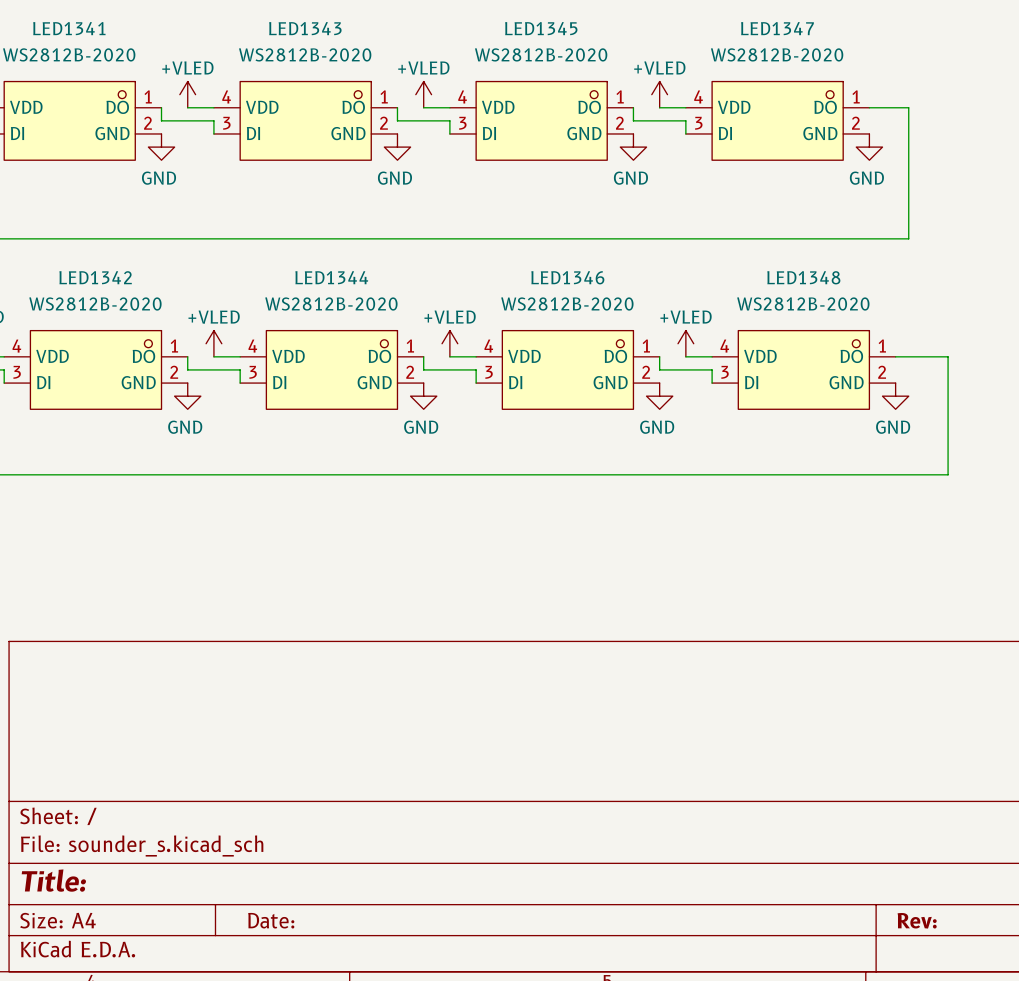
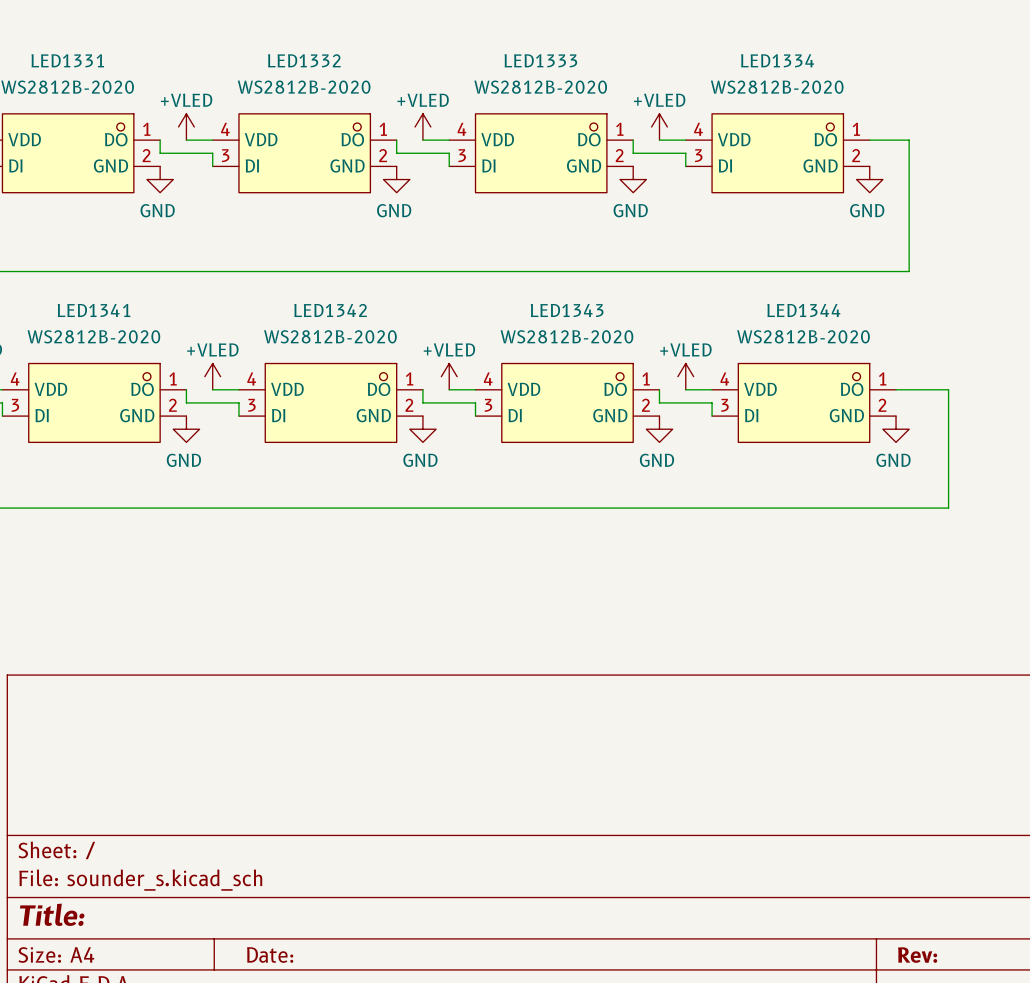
LED1341 name: LED1341 (69, 28) -> LED1331 (67, 60)
LED1343 name: LED1343 (305, 28) -> LED1332 (304, 60)
LED1345 name: LED1345 (541, 28) -> LED1333 (540, 60)
LED1347 name: LED1347 (777, 28) -> LED1334 (777, 60)
LED1342 name: LED1342 (95, 277) -> LED1341 (94, 310)
LED1344 name: LED1344 (331, 277) -> LED1342 (330, 310)
LED1346 name: LED1346 (567, 277) -> LED1343 (567, 310)
LED1348 name: LED1348 (803, 277) -> LED1344 (803, 310)

